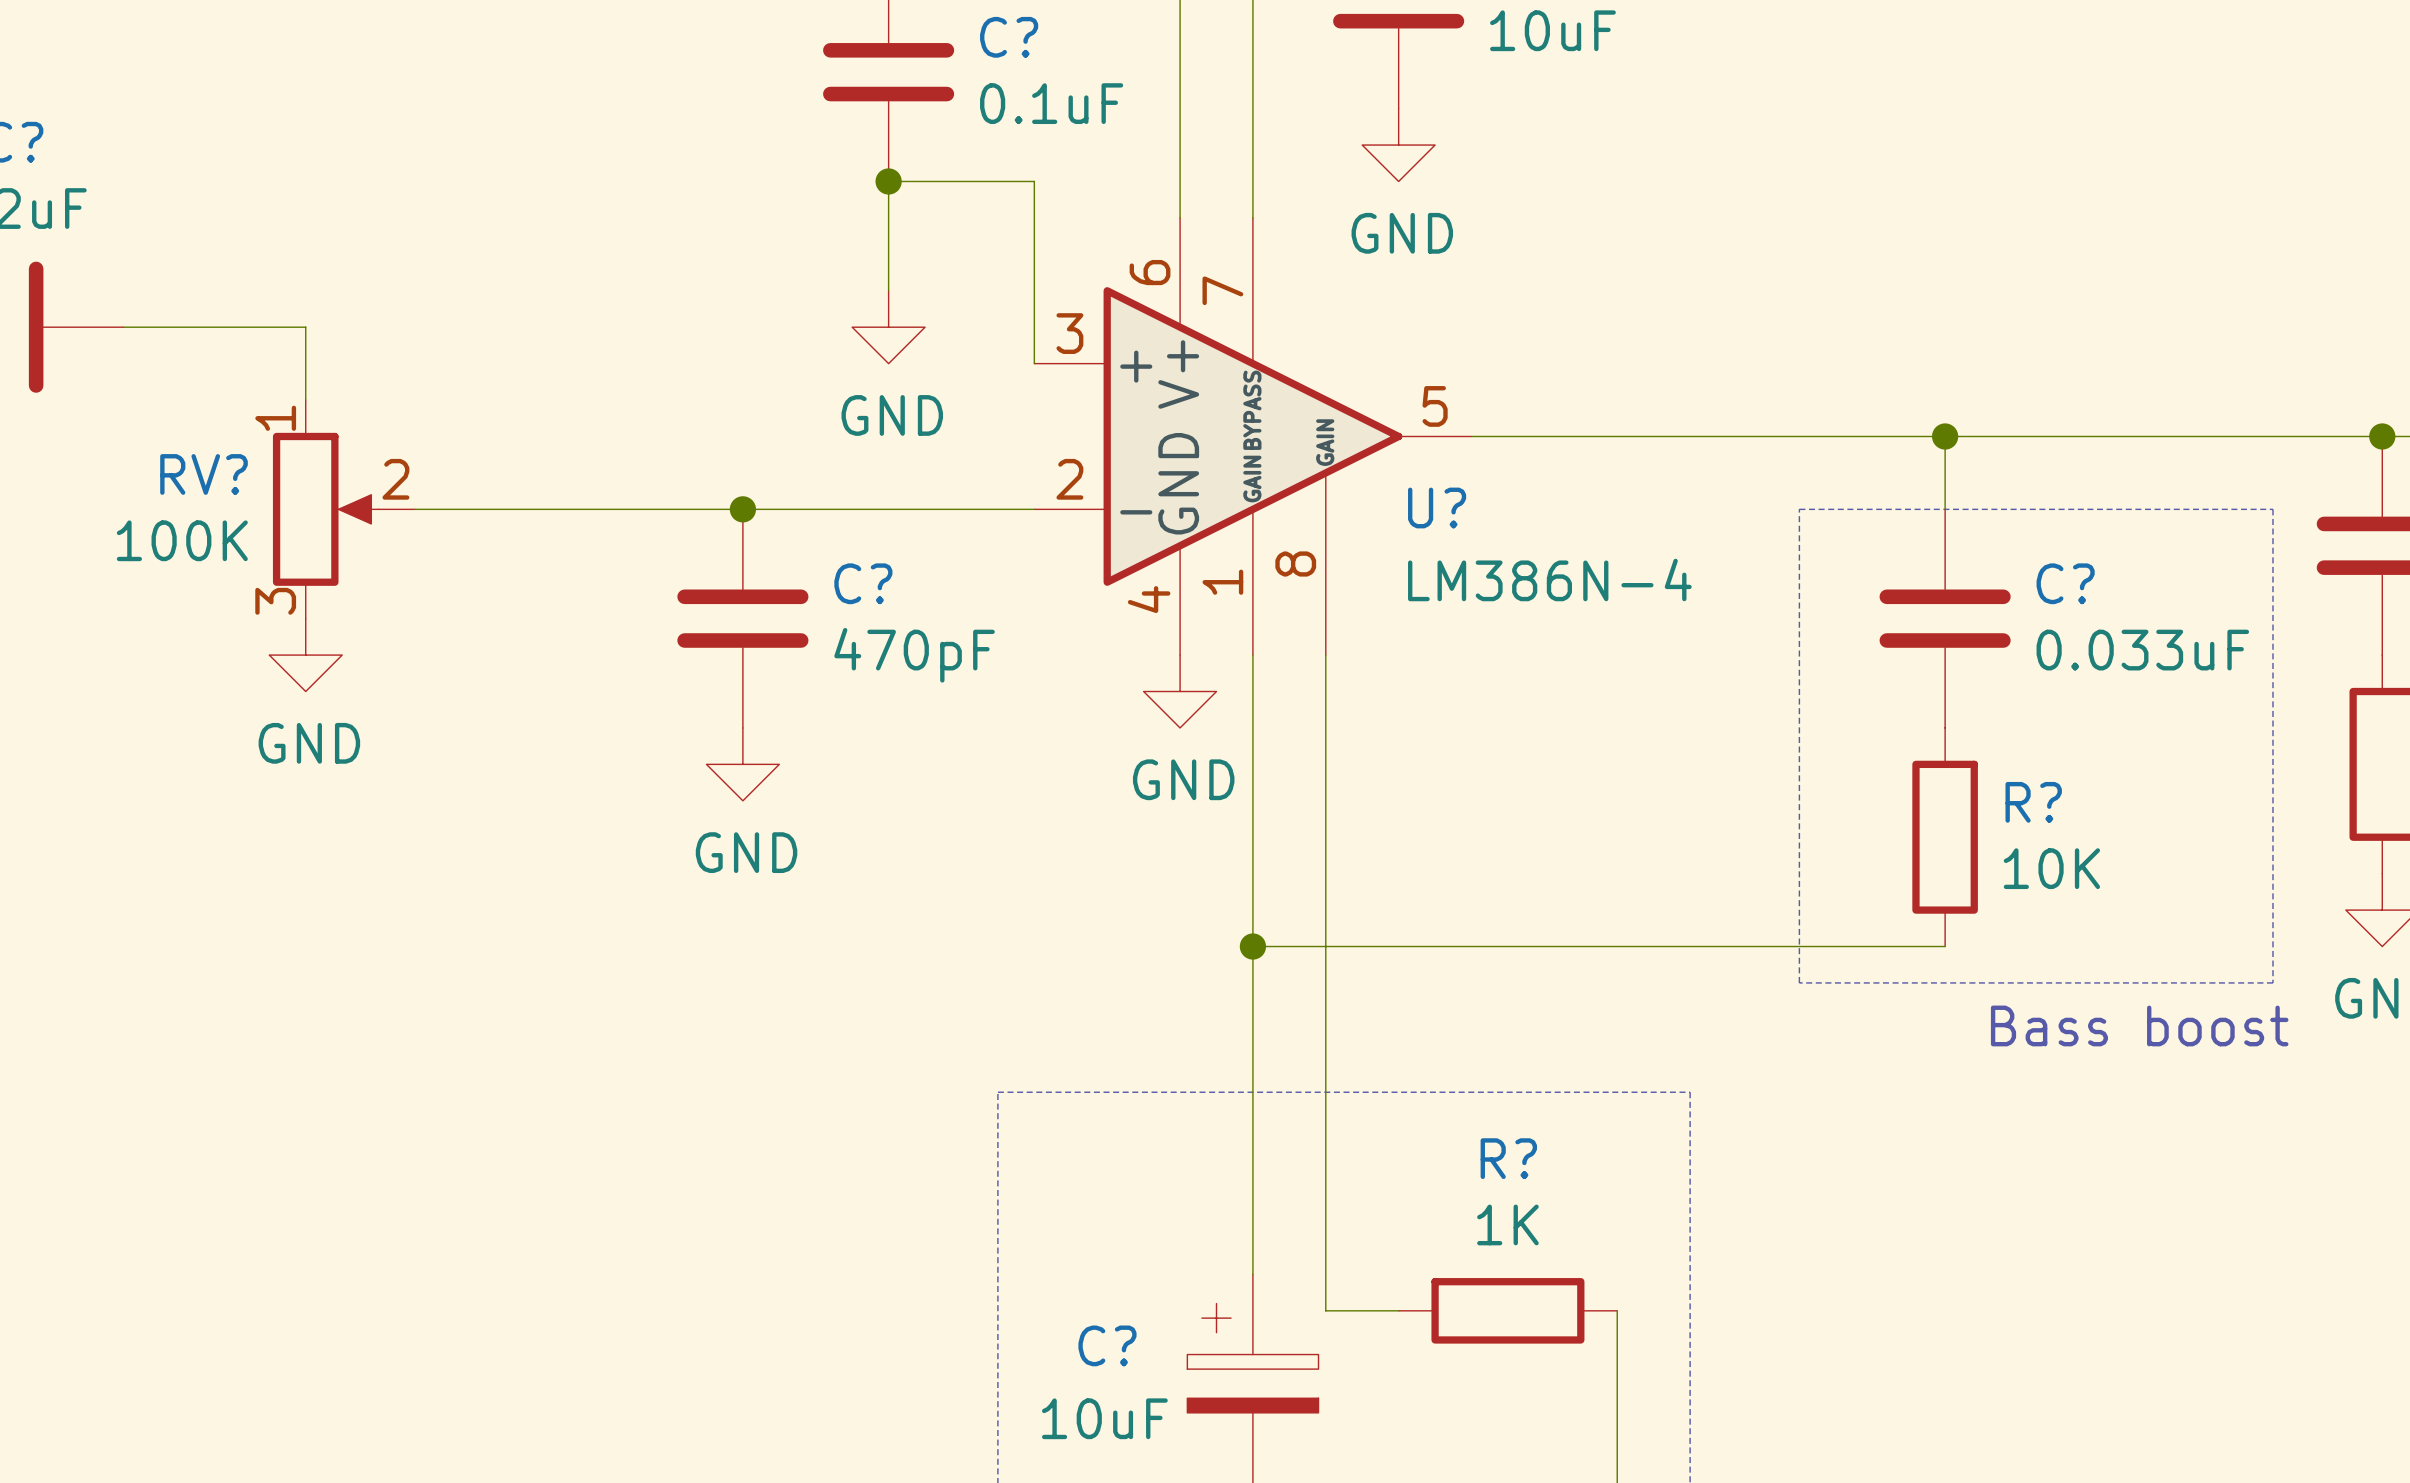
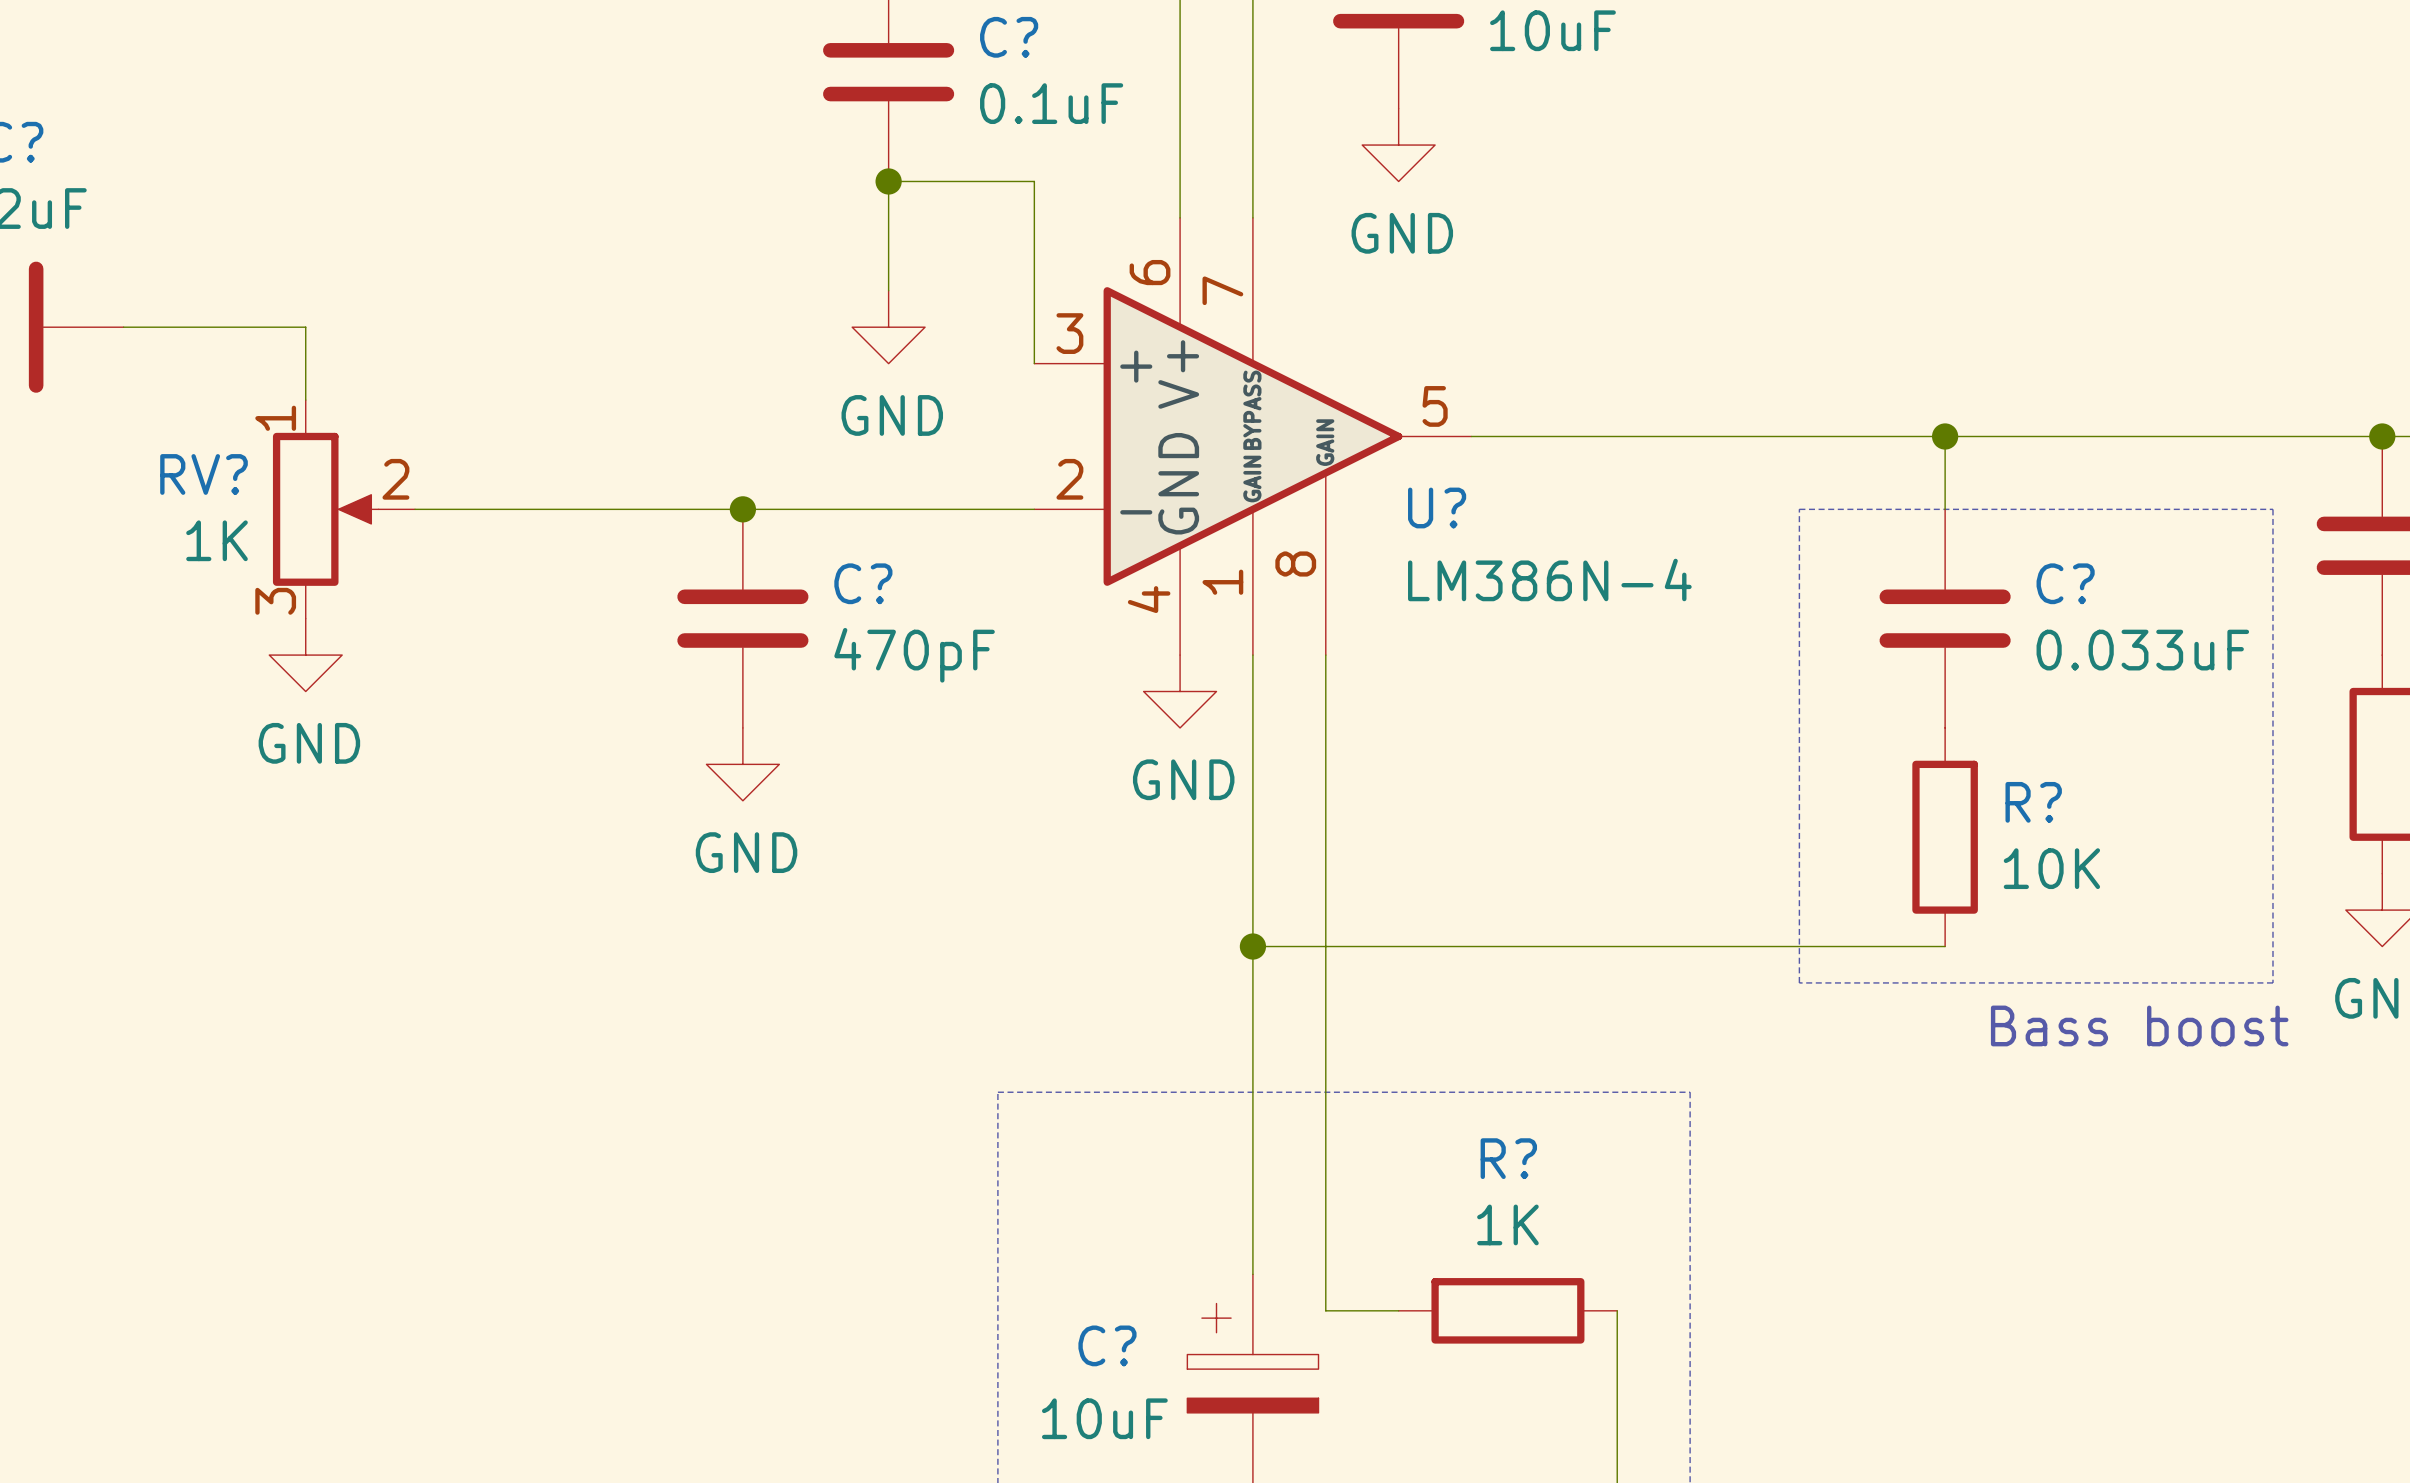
RV? value: 100K (182, 540) -> 1K (217, 540)

